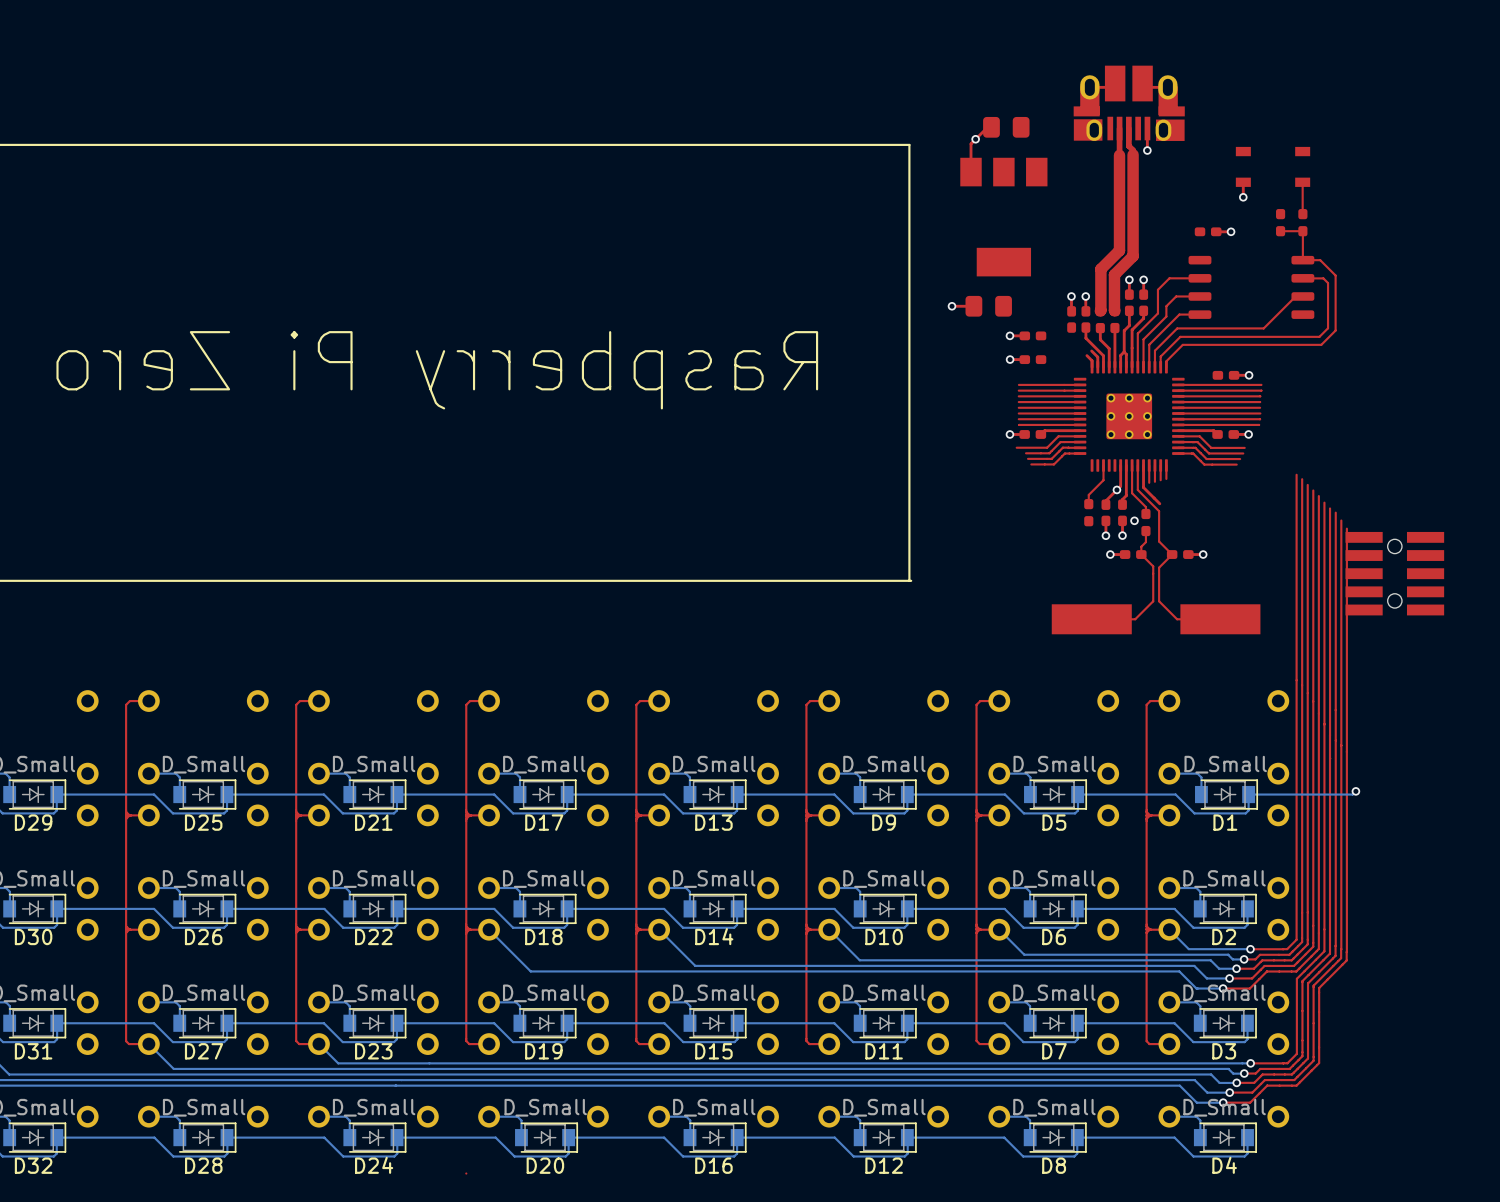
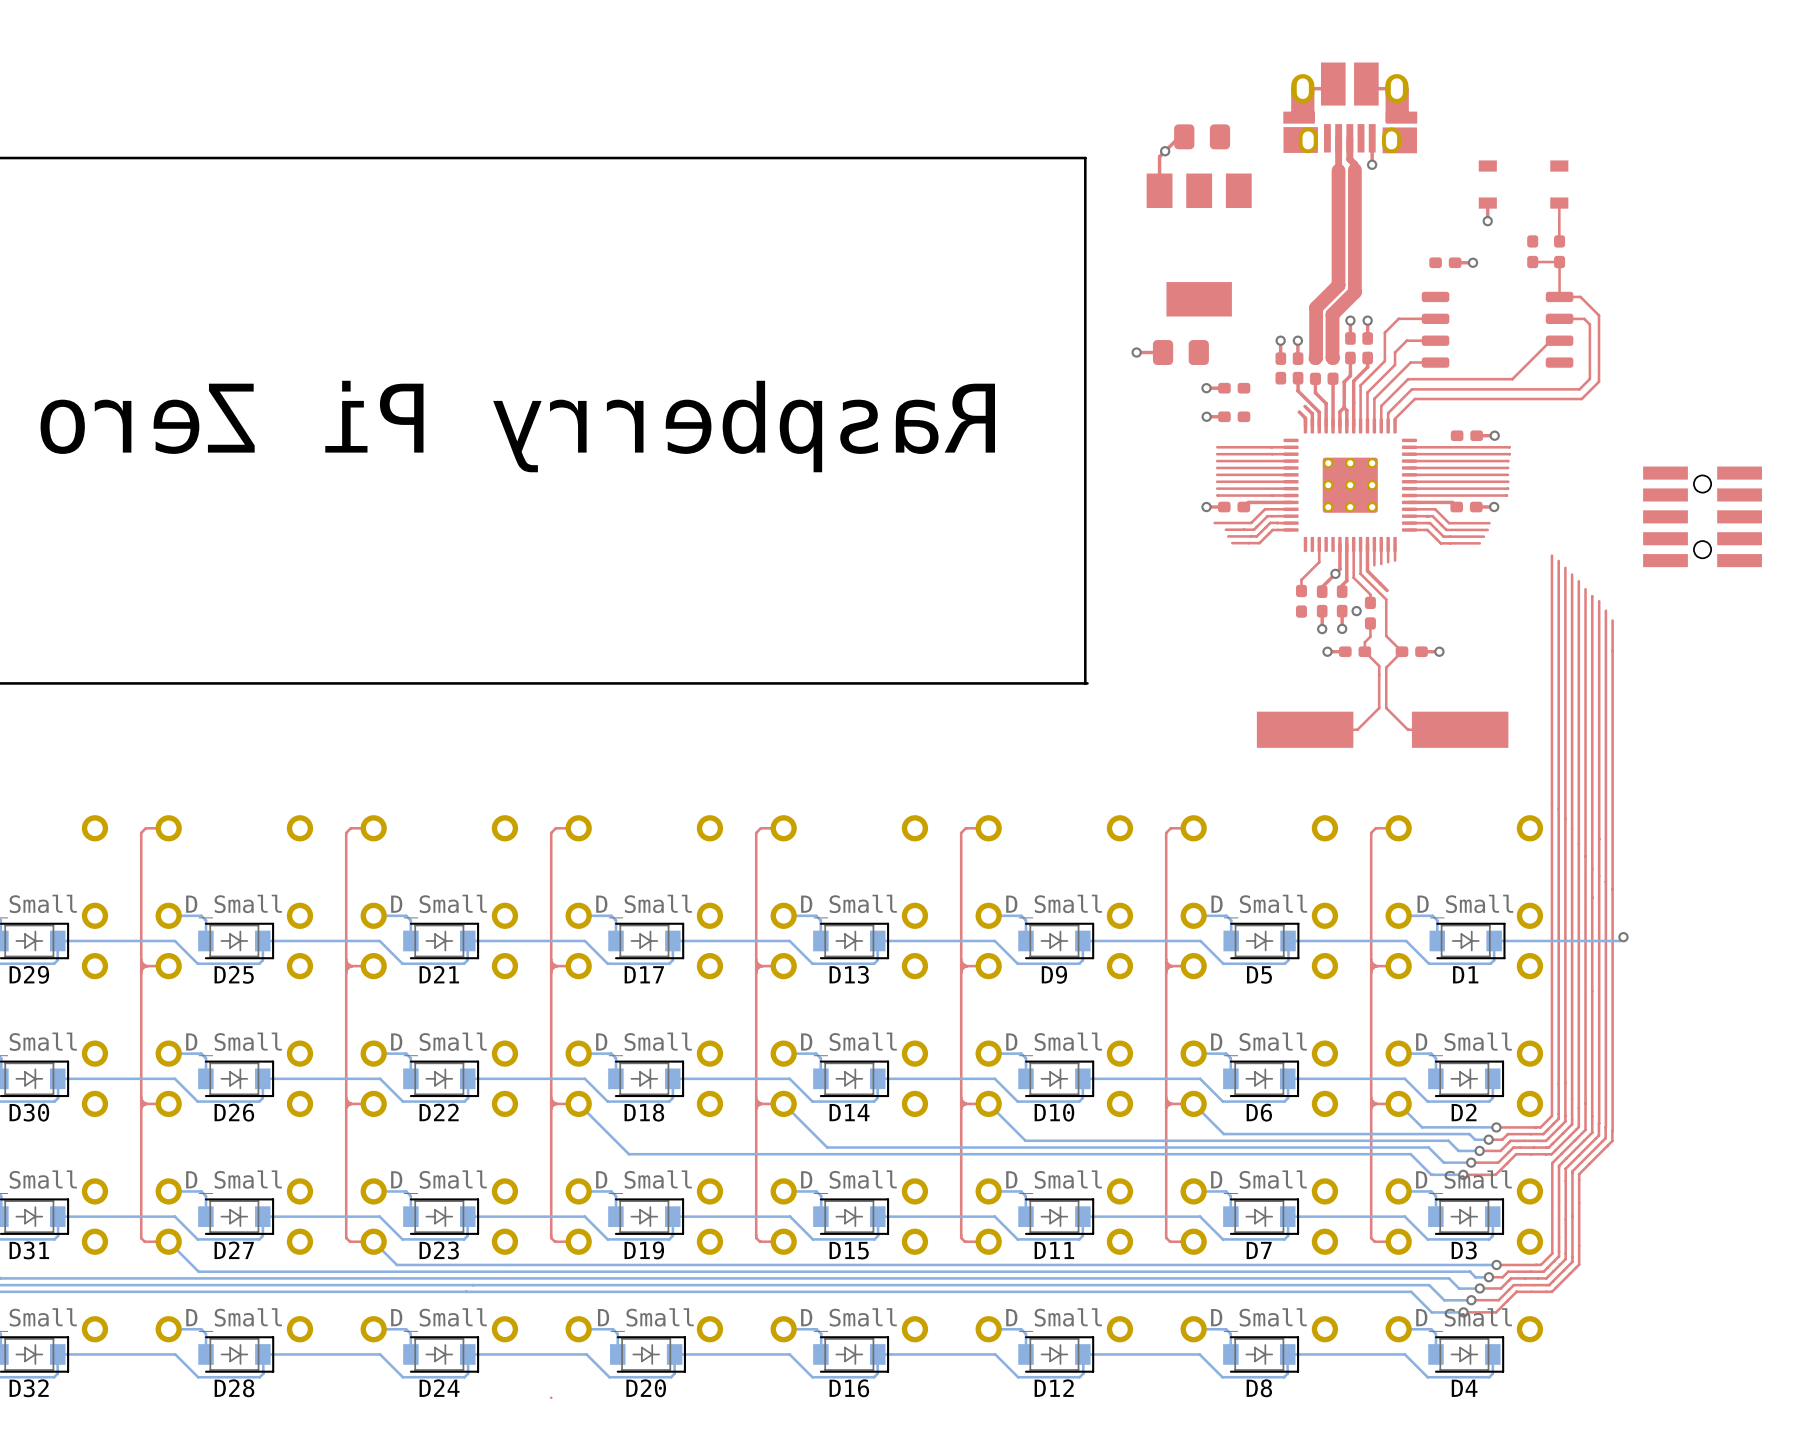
part position: (1394, 573) -> (1702, 516)

